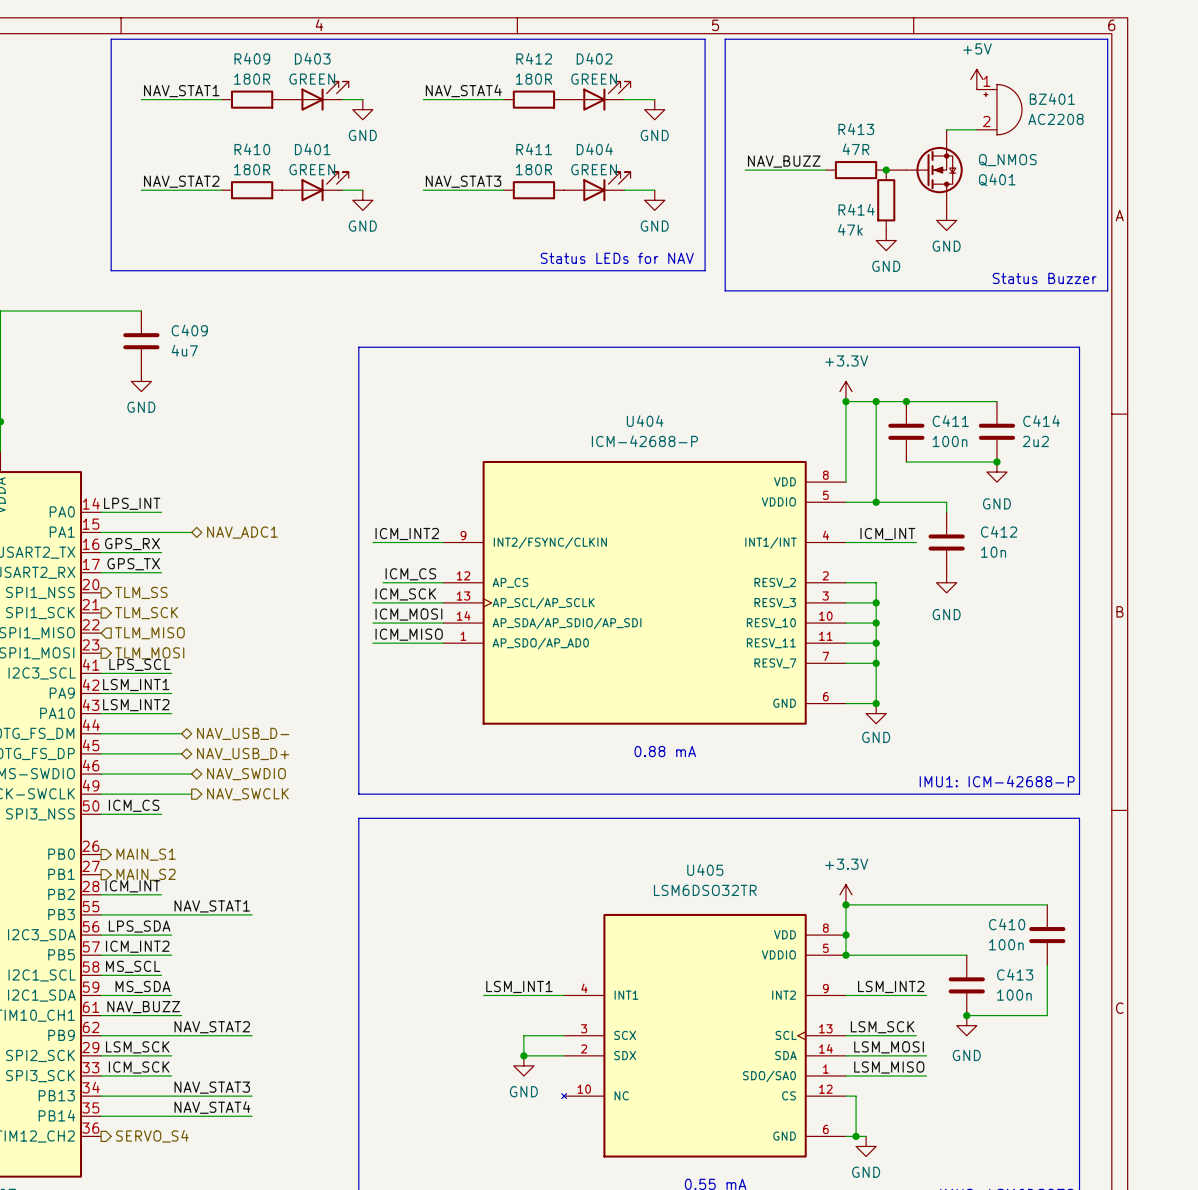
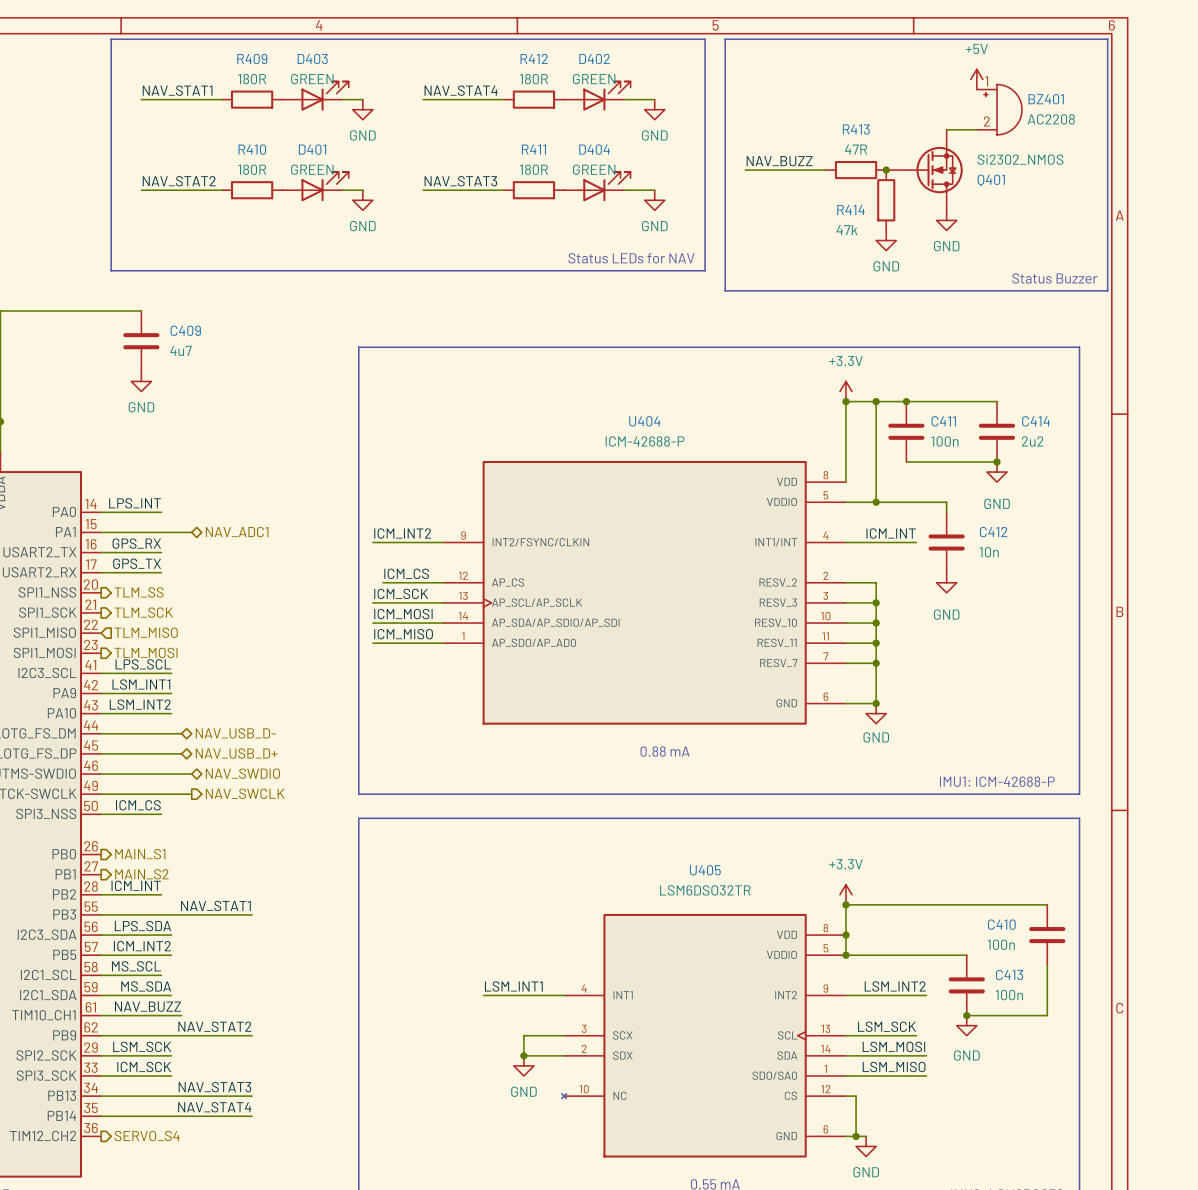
Q401 value: Q_NMOS (1007, 160) -> Si2302_NMOS (1020, 159)

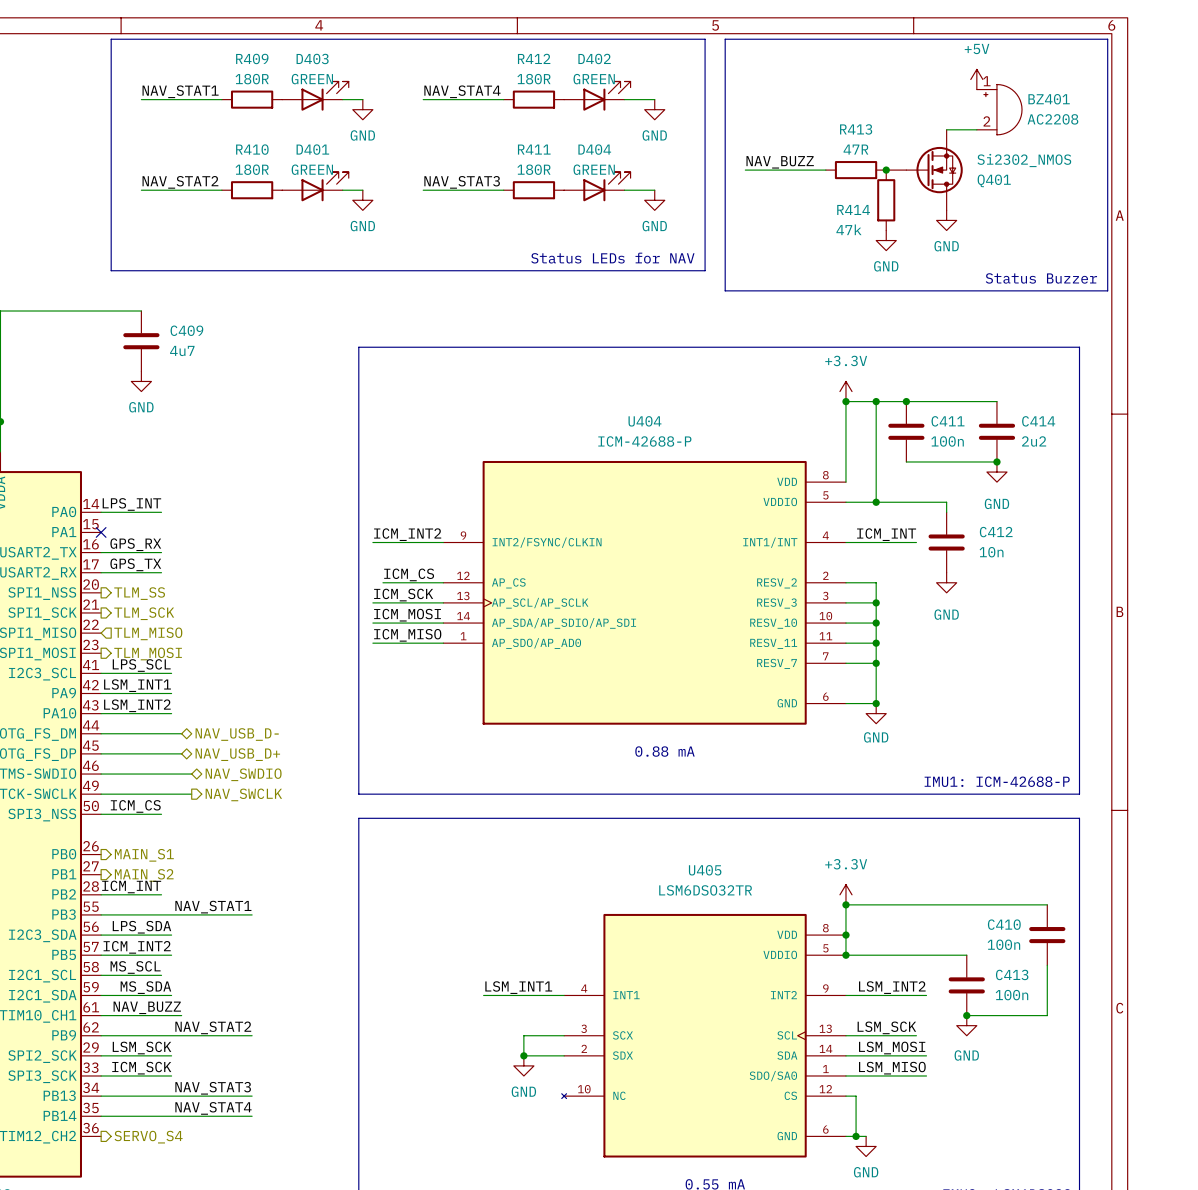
wire: (101, 532) (191, 532) -> none
no-connect mark: none -> (101, 532)
hierarchical label: NAV_ADC1 (237, 532) -> none

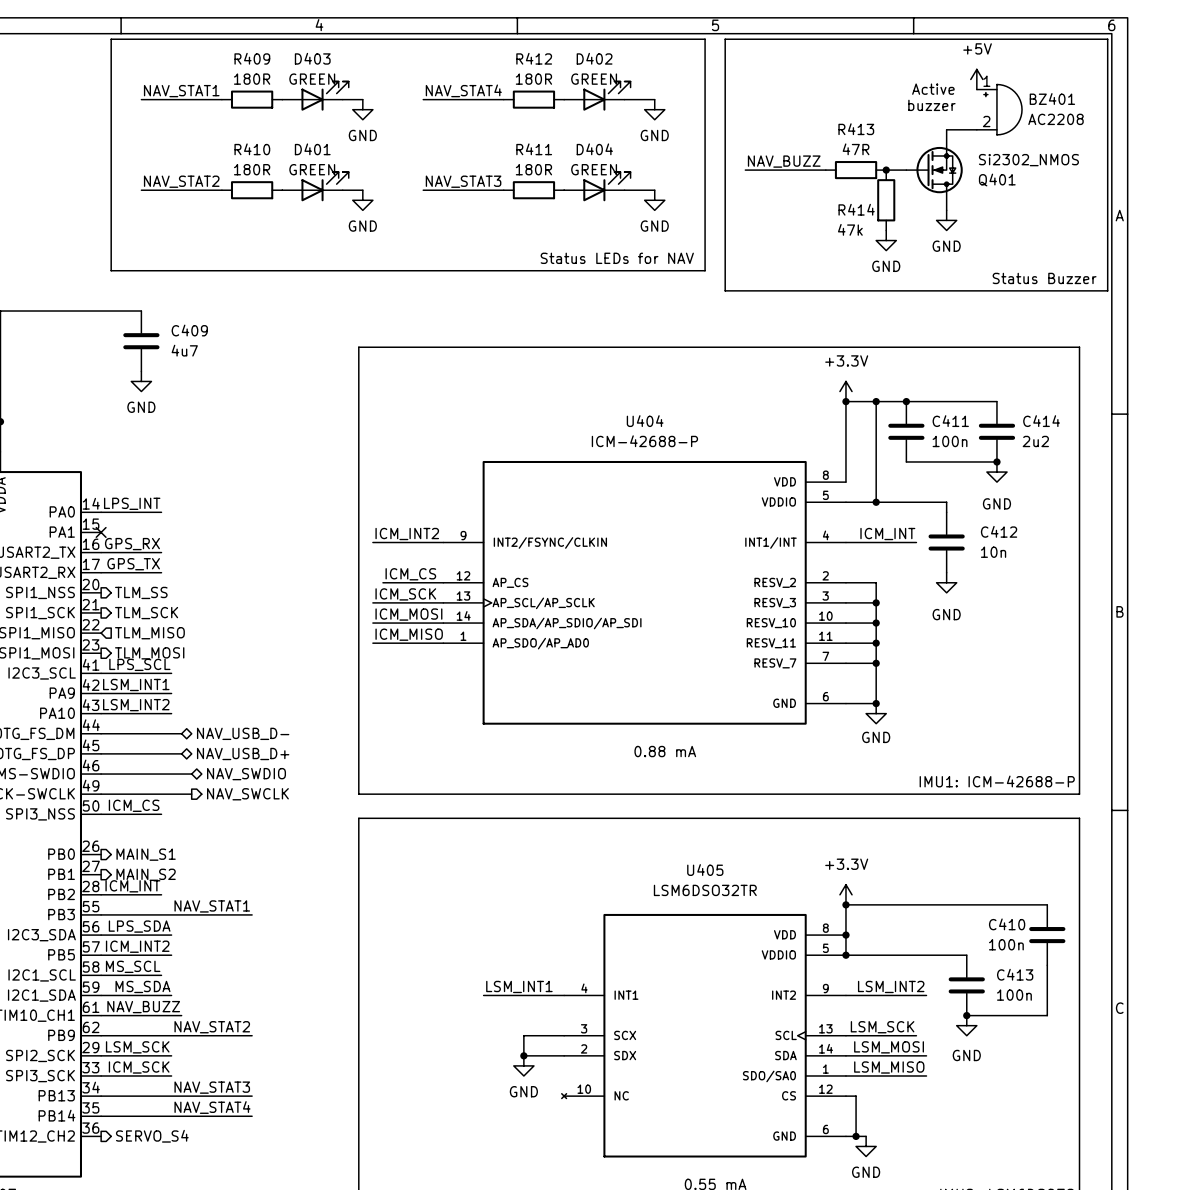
text: none -> Active (933, 89)
text: none -> buzzer (931, 105)

